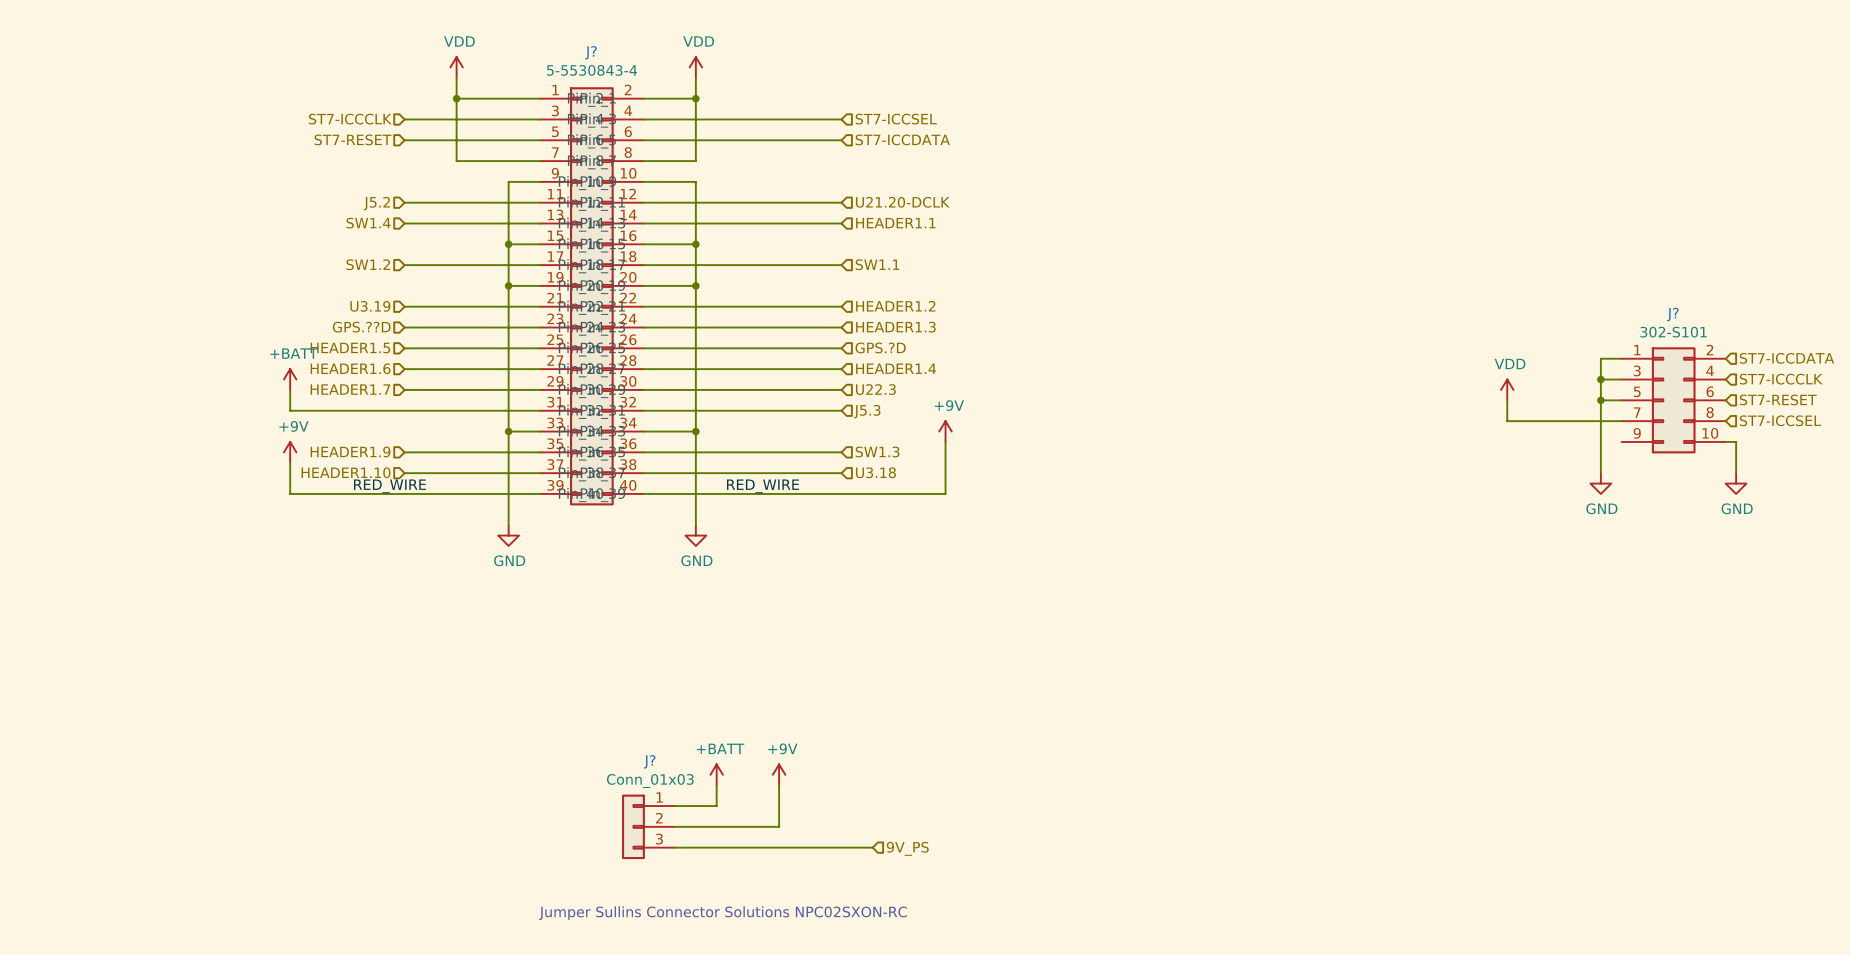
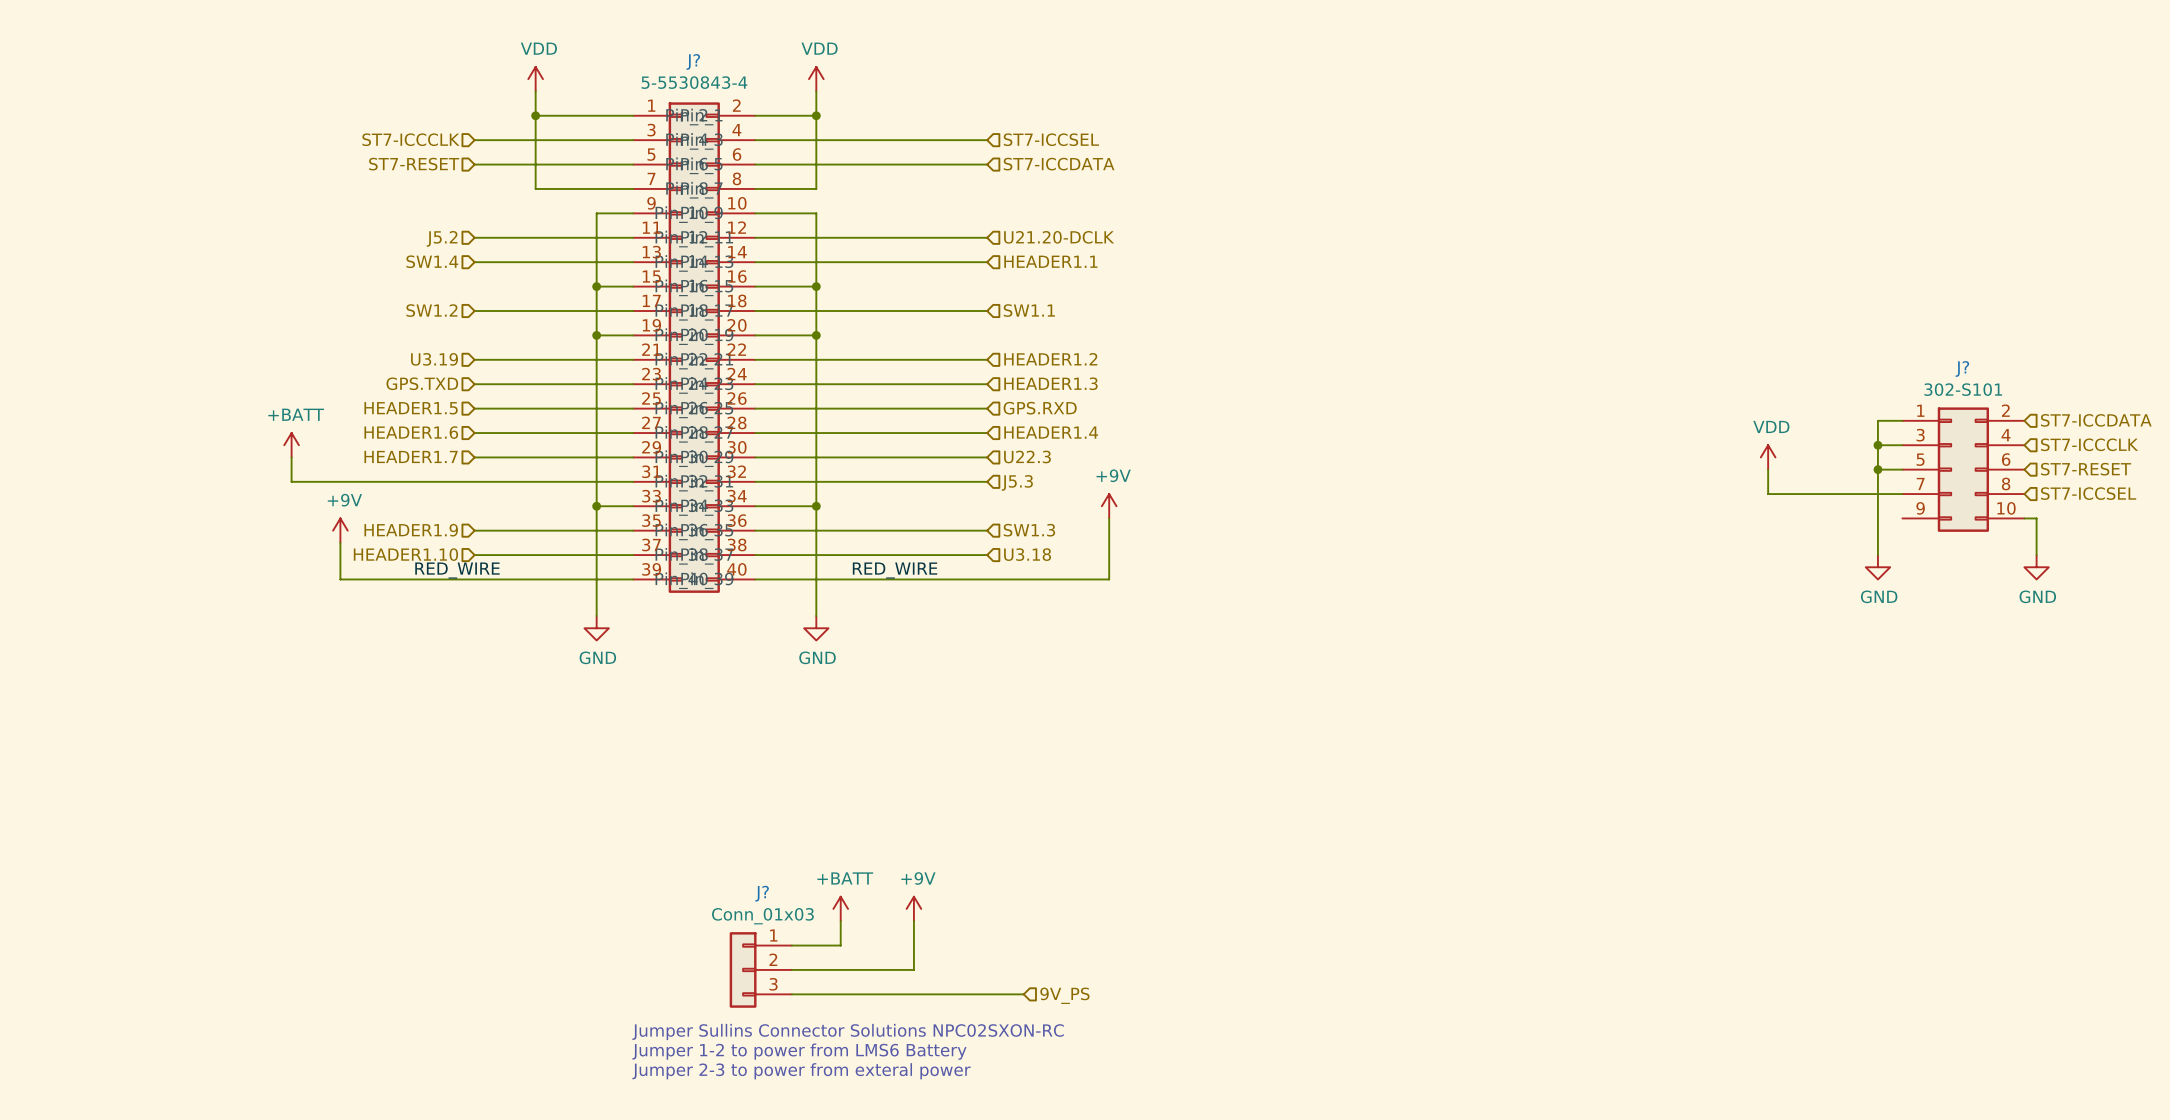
hierarchical label: GPS.??D (361, 327) -> GPS.TXD (422, 383)
hierarchical label: GPS.?D (880, 347) -> GPS.RXD (1040, 408)
power symbol position: +BATT (290, 379) -> +BATT (291, 445)
wire: (290, 389) (290, 410) -> (291, 457) (291, 481) (340, 481)
text: none -> Jumper Sullins Connector Solutions NPC02SXON-RC (848, 1031)
text: none -> Jumper 1-2 to power from LMS6 Battery (799, 1051)
text: Jumper Sullins Connector Solutions NPC02SXON-RC (722, 913) -> Jumper 2-3 to power from exteral power (801, 1071)

